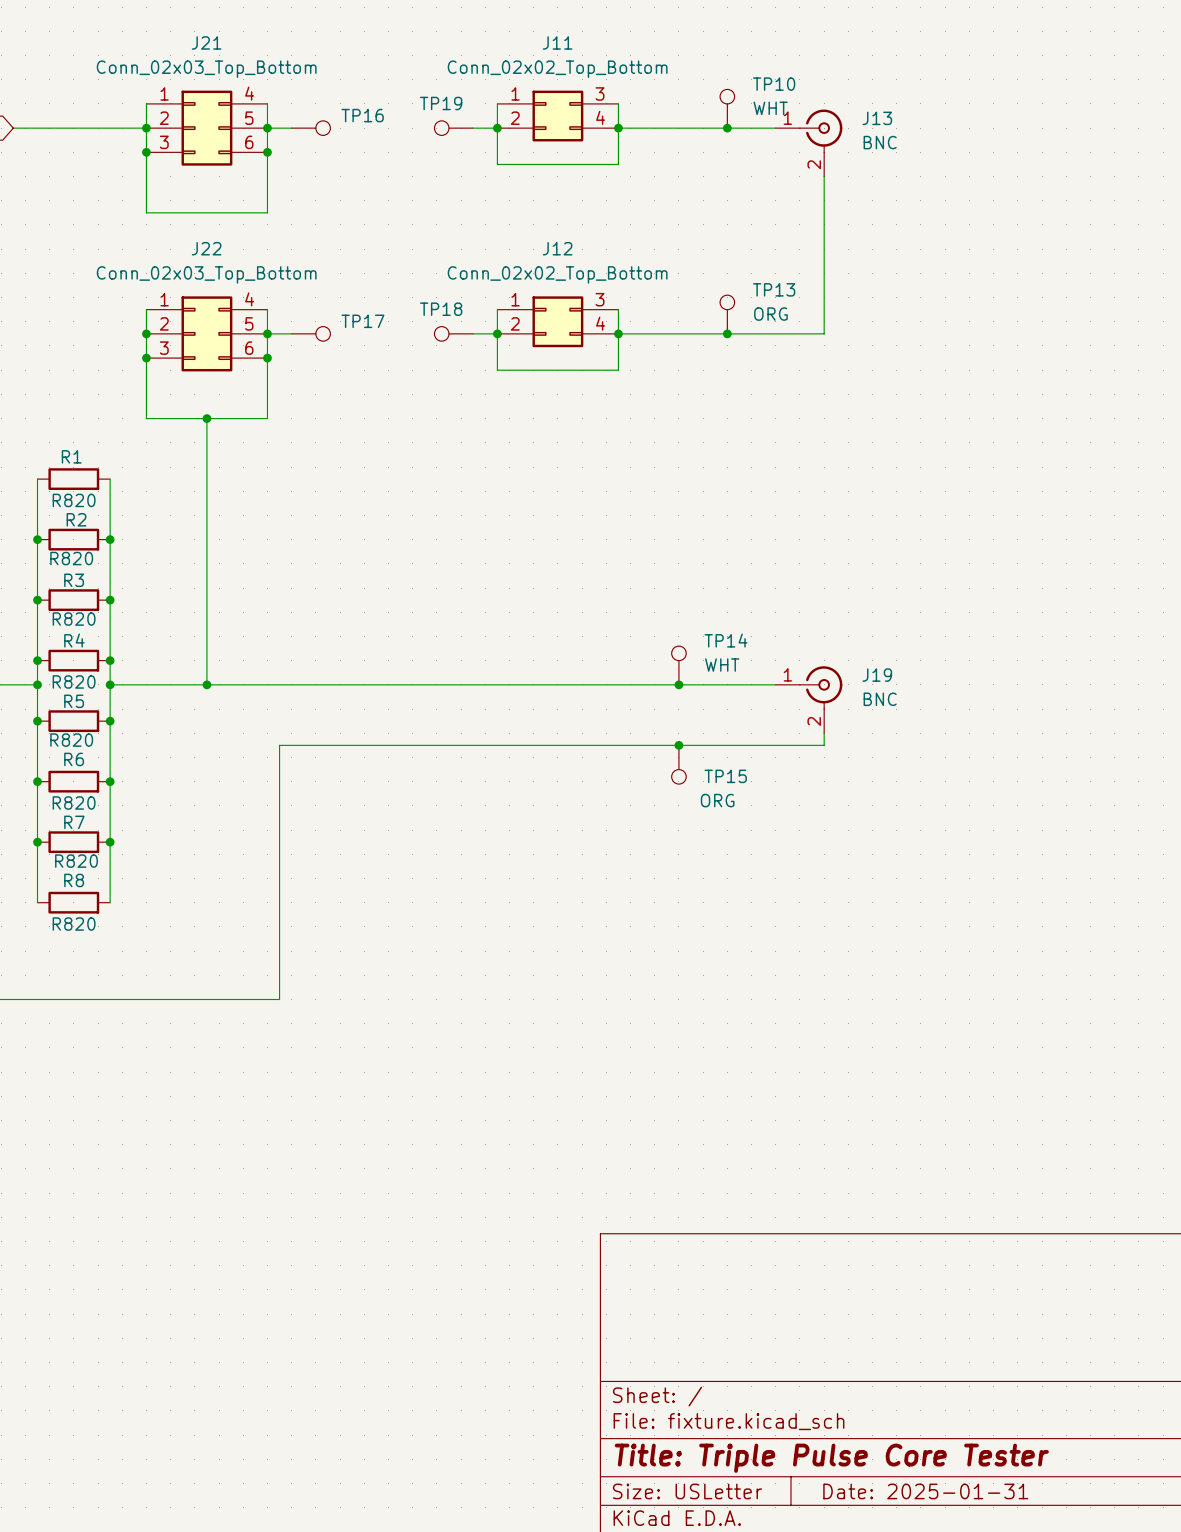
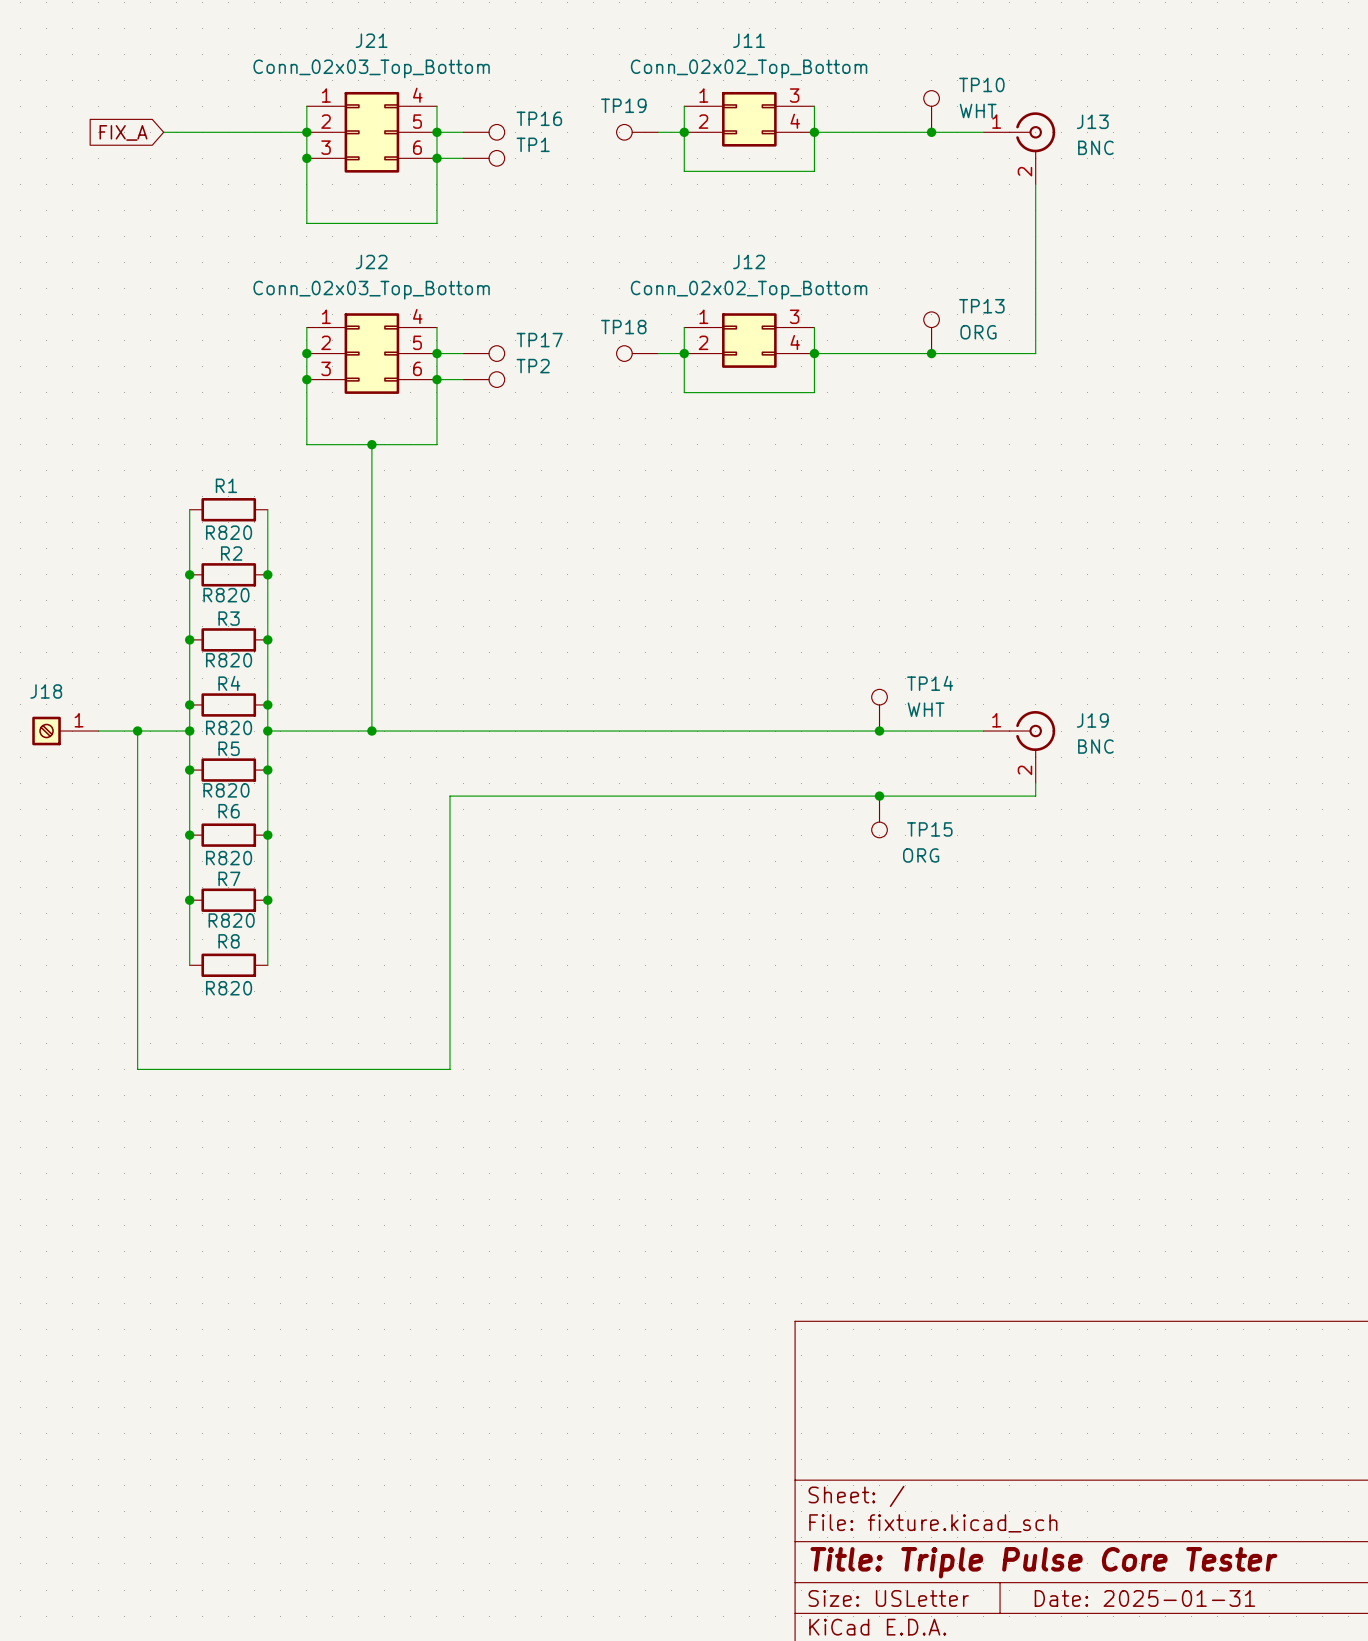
wire: none -> (436, 158) (463, 158)
TP1: none -> (483, 158)
wire: none -> (436, 379) (463, 379)
TP2: none -> (483, 379)

